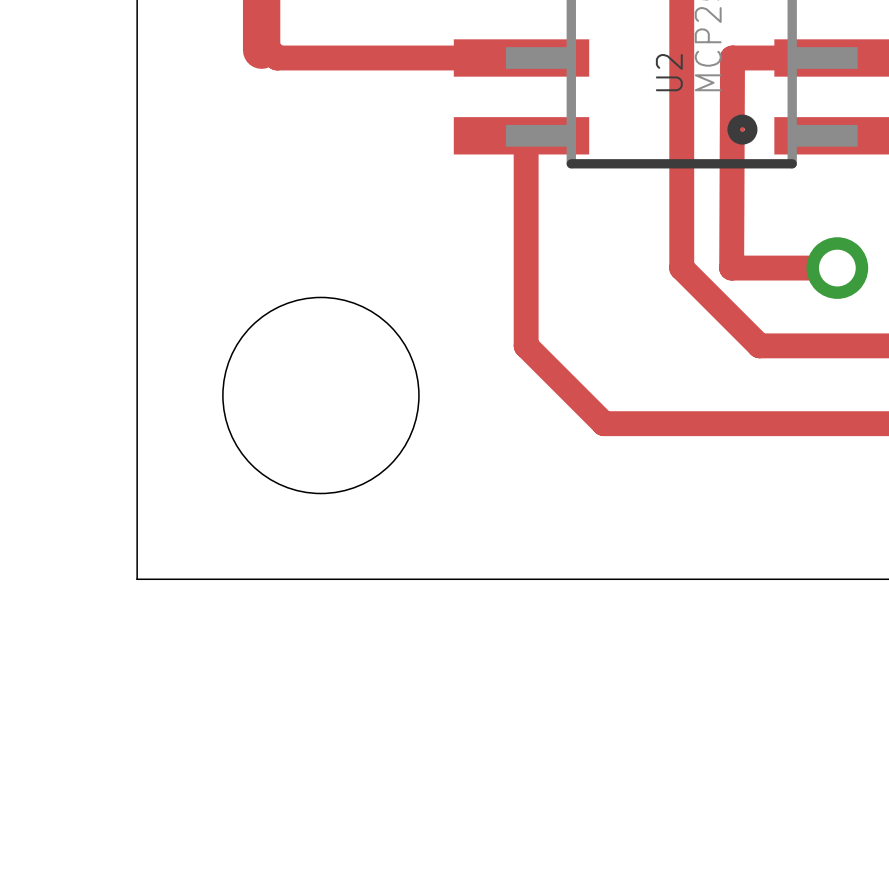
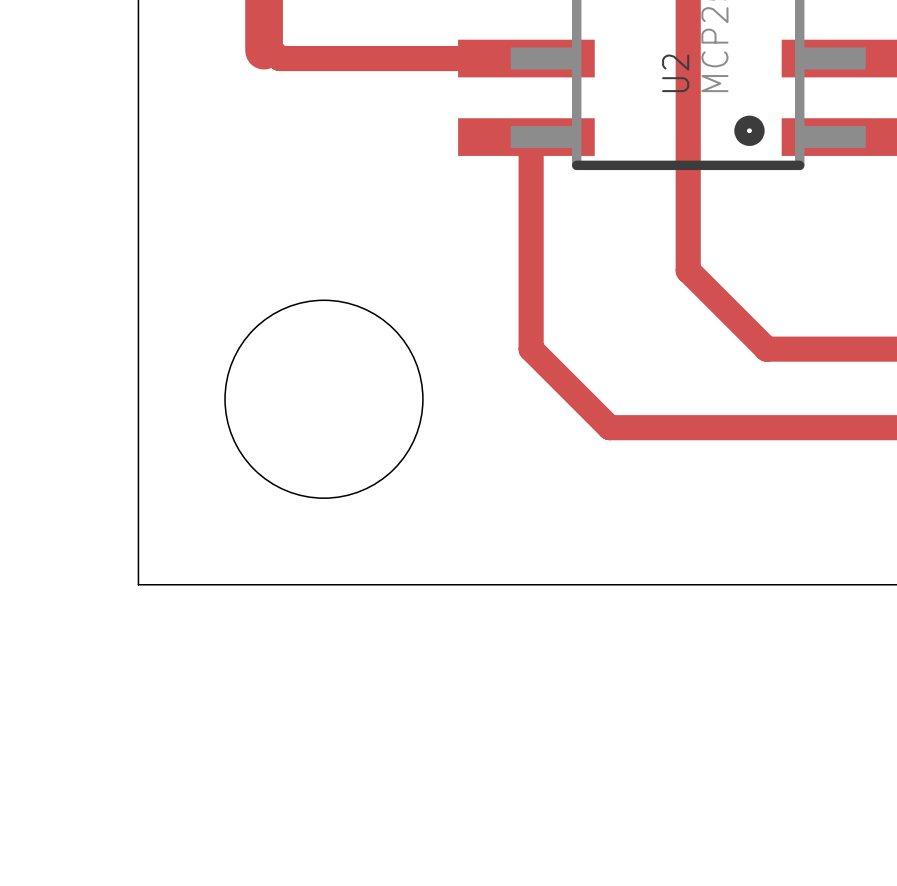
track: (842, 57) (732, 57) (731, 268) (837, 268) -> none
via: (837, 268) -> none

